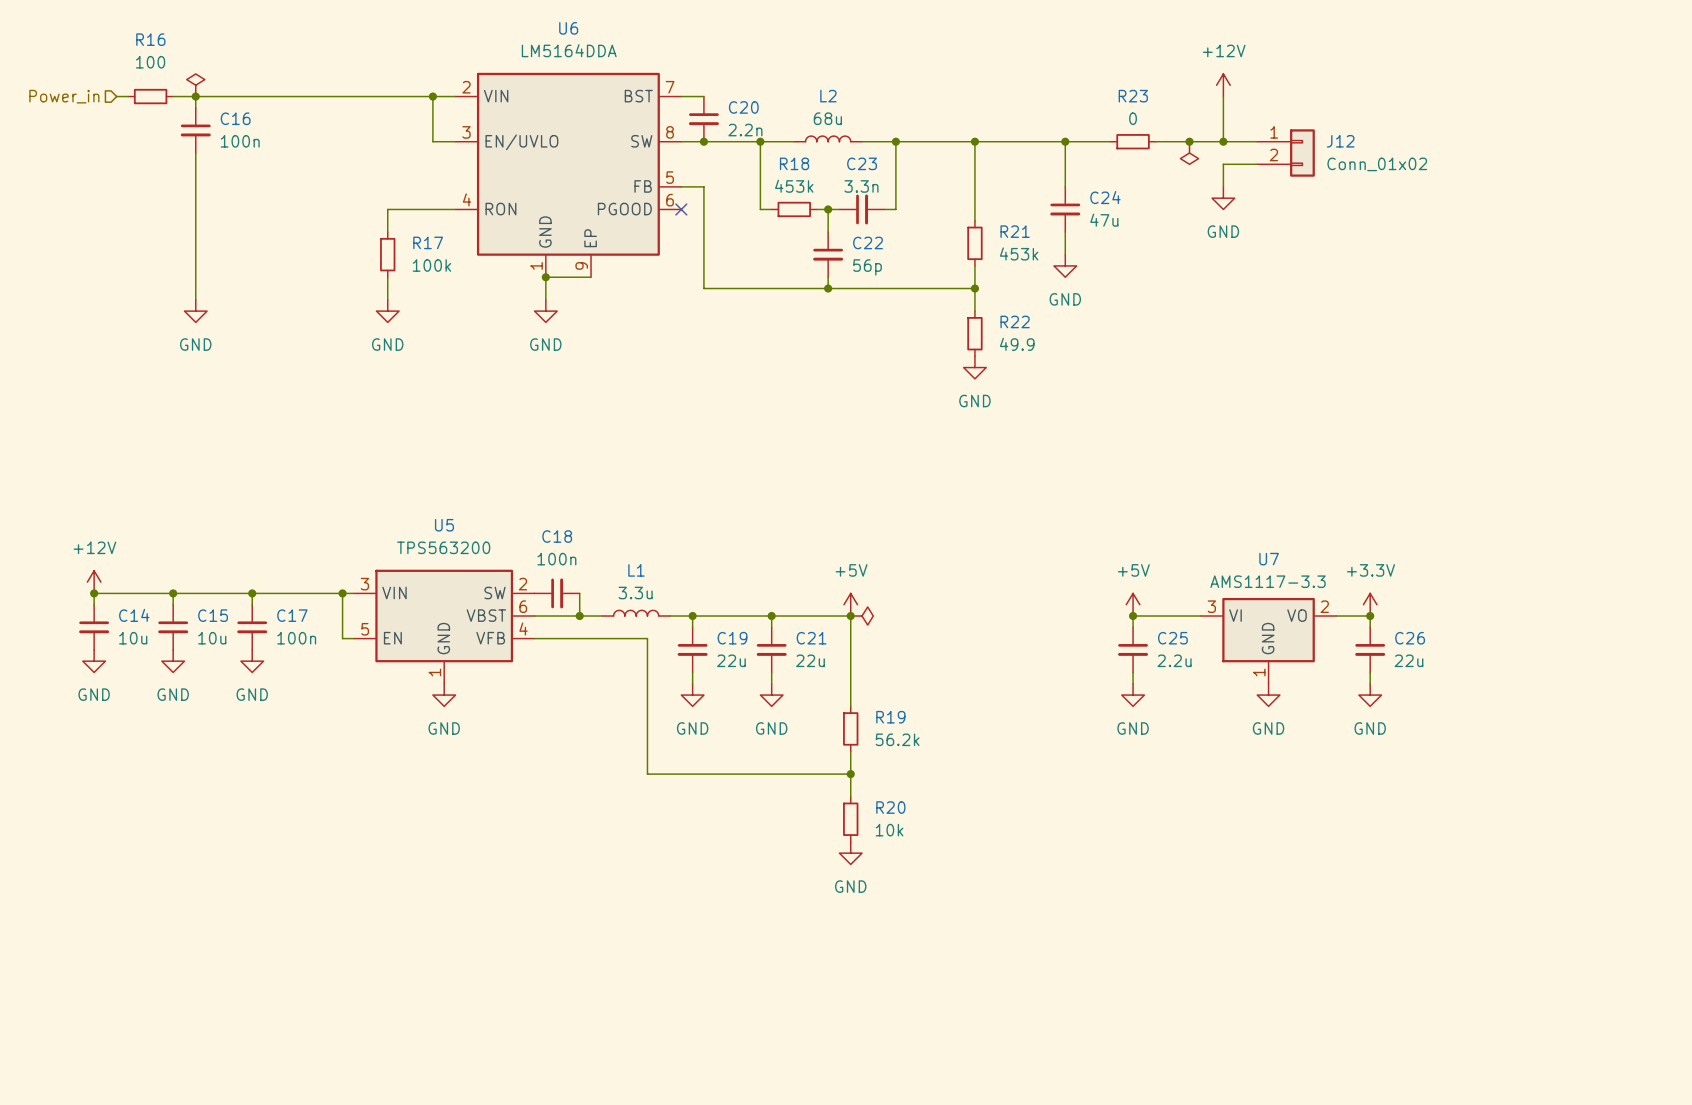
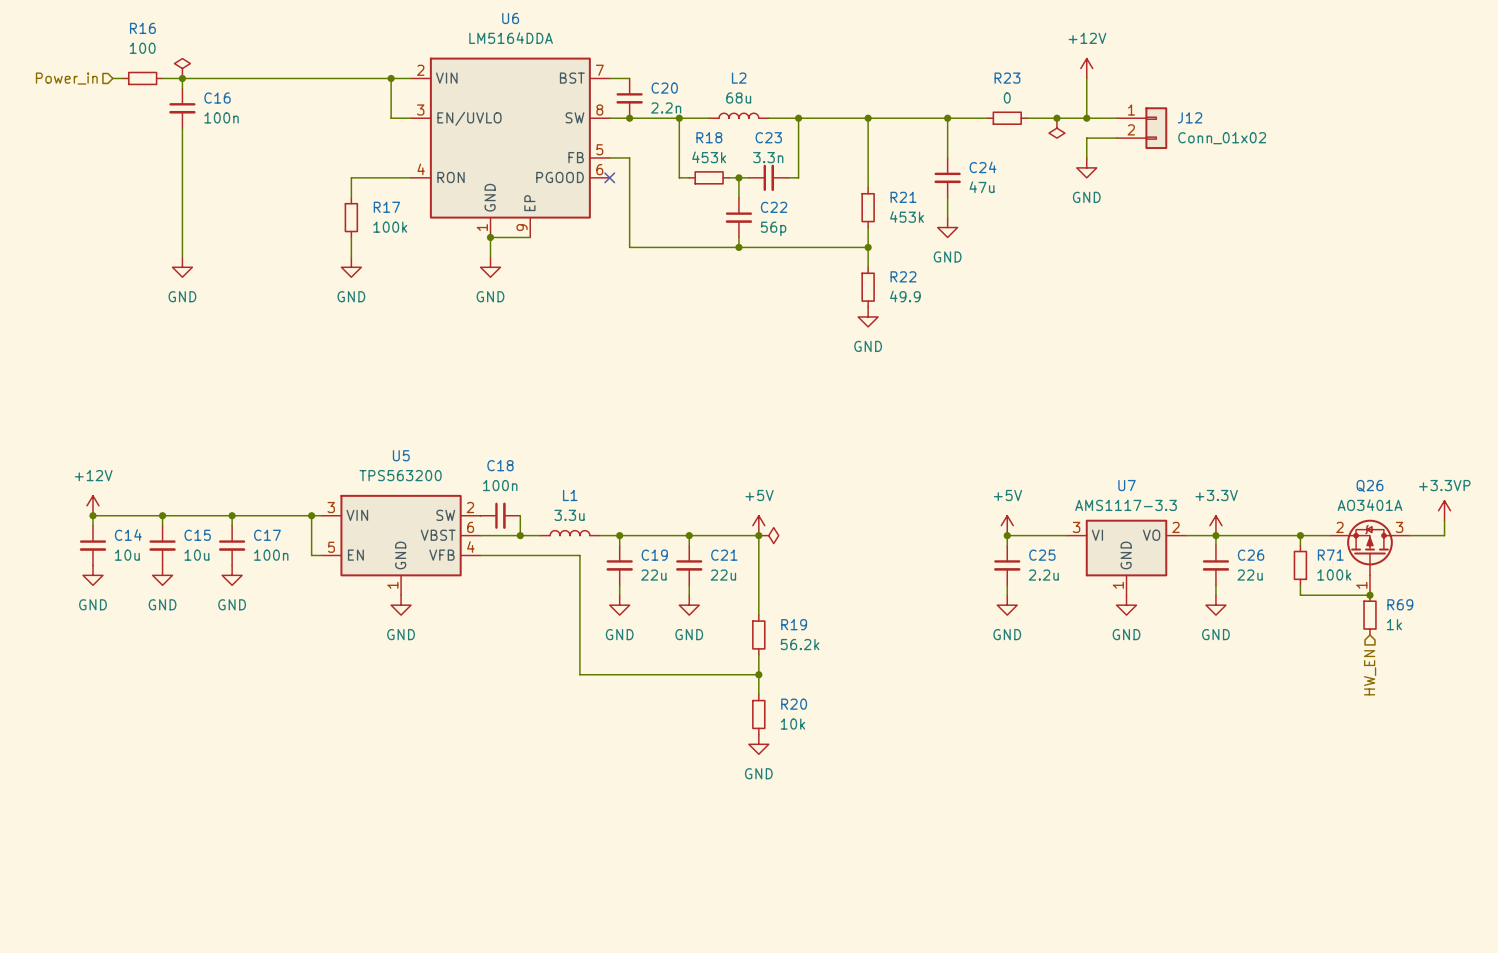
power symbol: none -> +3.3VP (1444, 510)
wire: none -> (1444, 520) (1444, 535) (1409, 535)
wire: none -> (1215, 535) (1330, 535)
wire: none -> (1300, 535) (1300, 545)
junction: none -> (1300, 535)
Q26: none -> AO3401A (1369, 557)
R71: none -> 100k (1300, 565)
wire: none -> (1300, 585) (1300, 595) (1369, 595)
junction: none -> (1369, 595)
R69: none -> 1k (1369, 615)
hierarchical label: none -> HW_EN (1370, 672)

